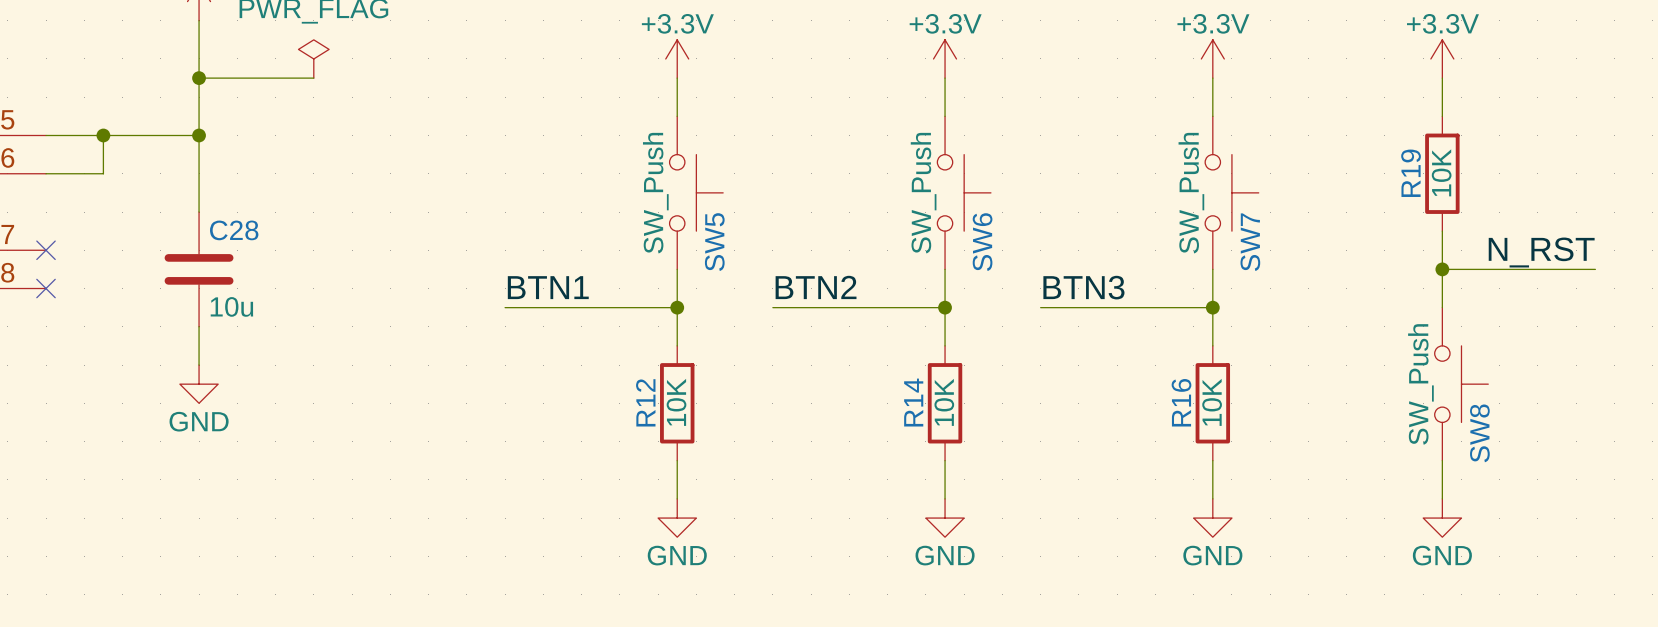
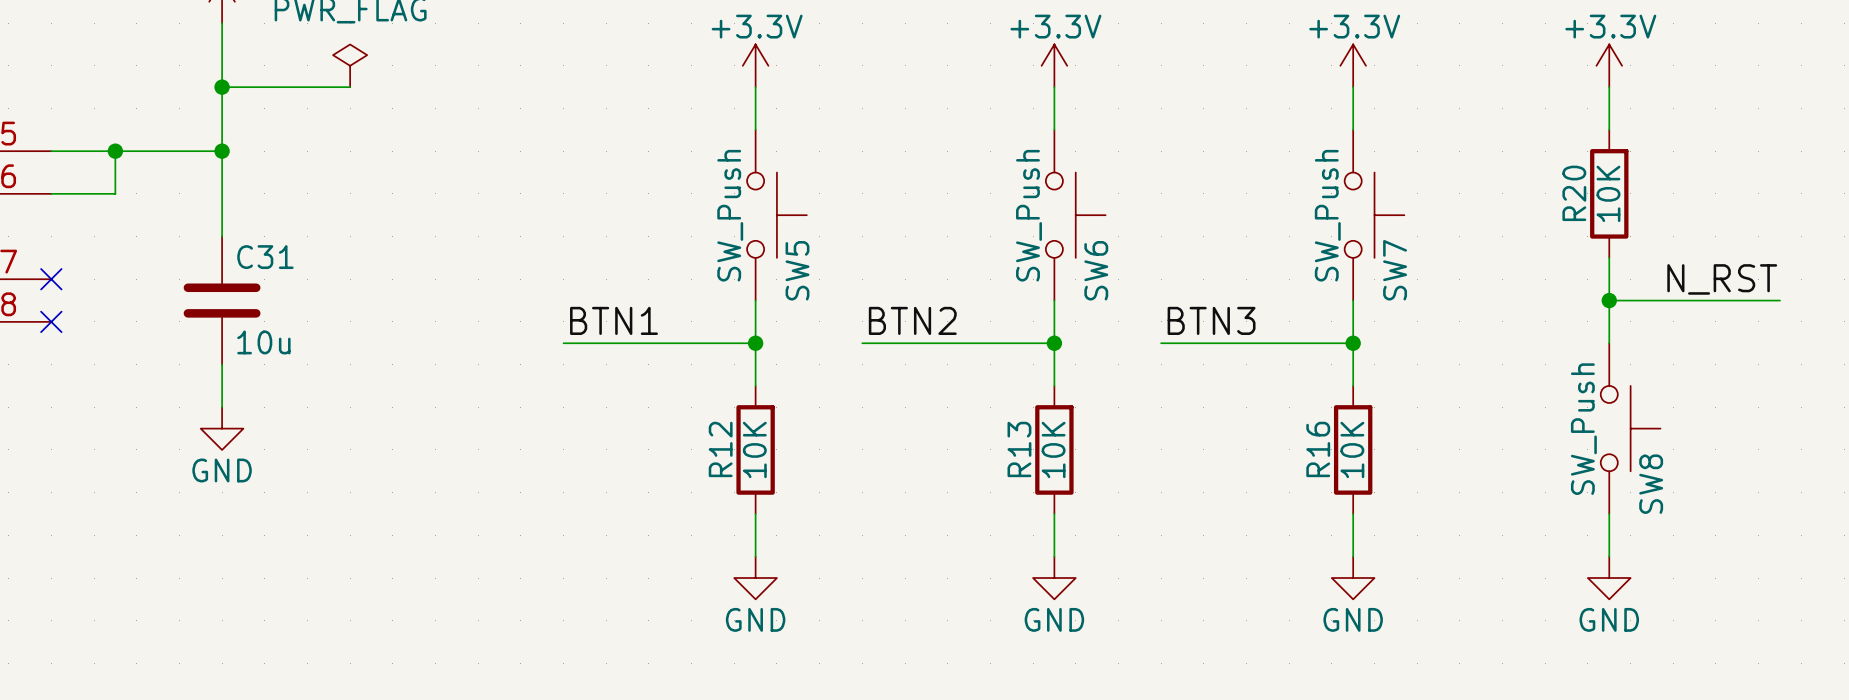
R19 name: R19 (1411, 173) -> R20 (1574, 193)
C28 name: C28 (234, 230) -> C31 (265, 257)
R14 name: R14 (913, 402) -> R13 (1019, 449)

